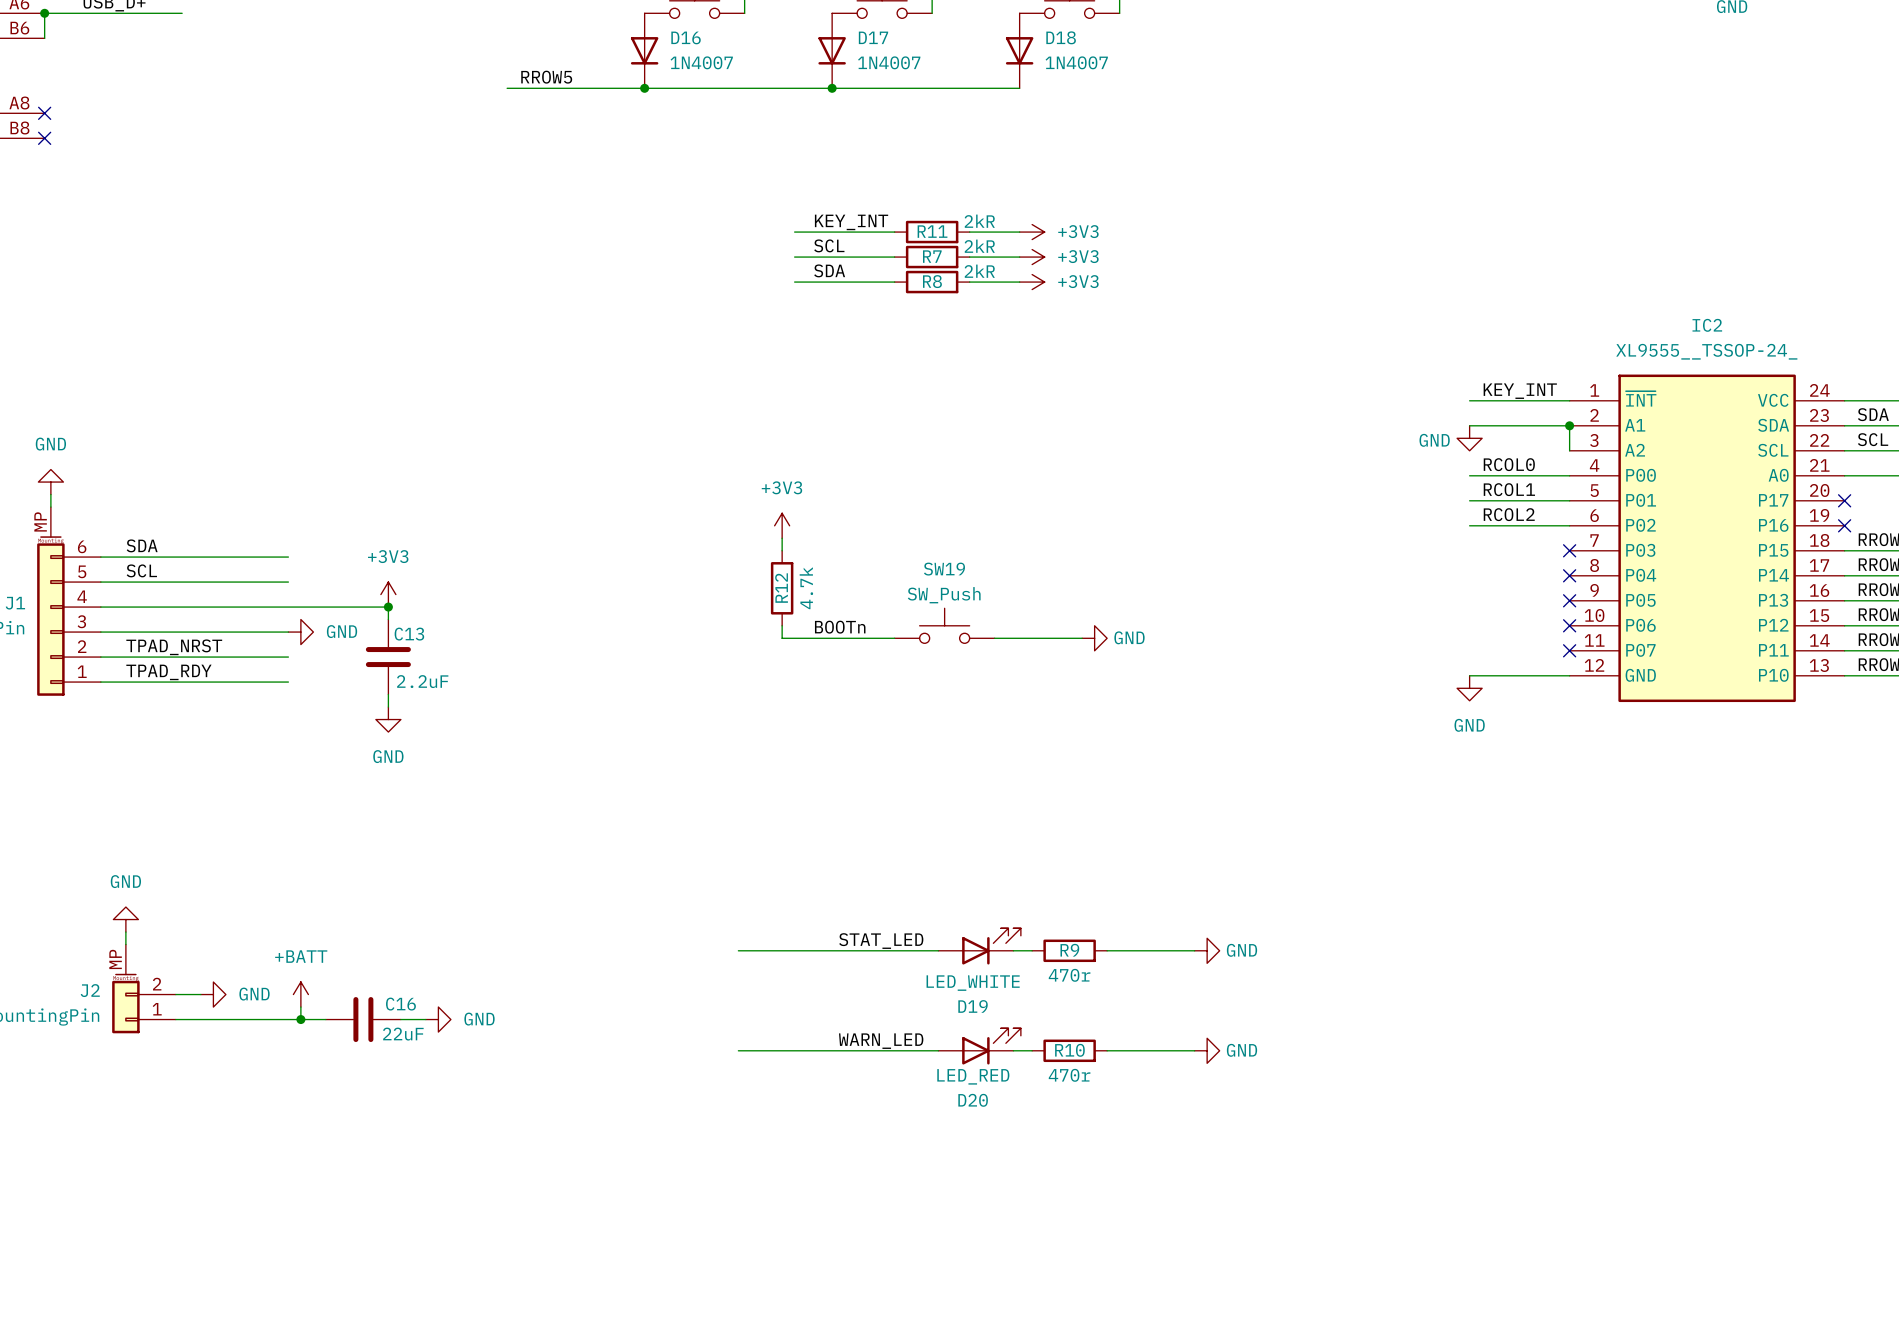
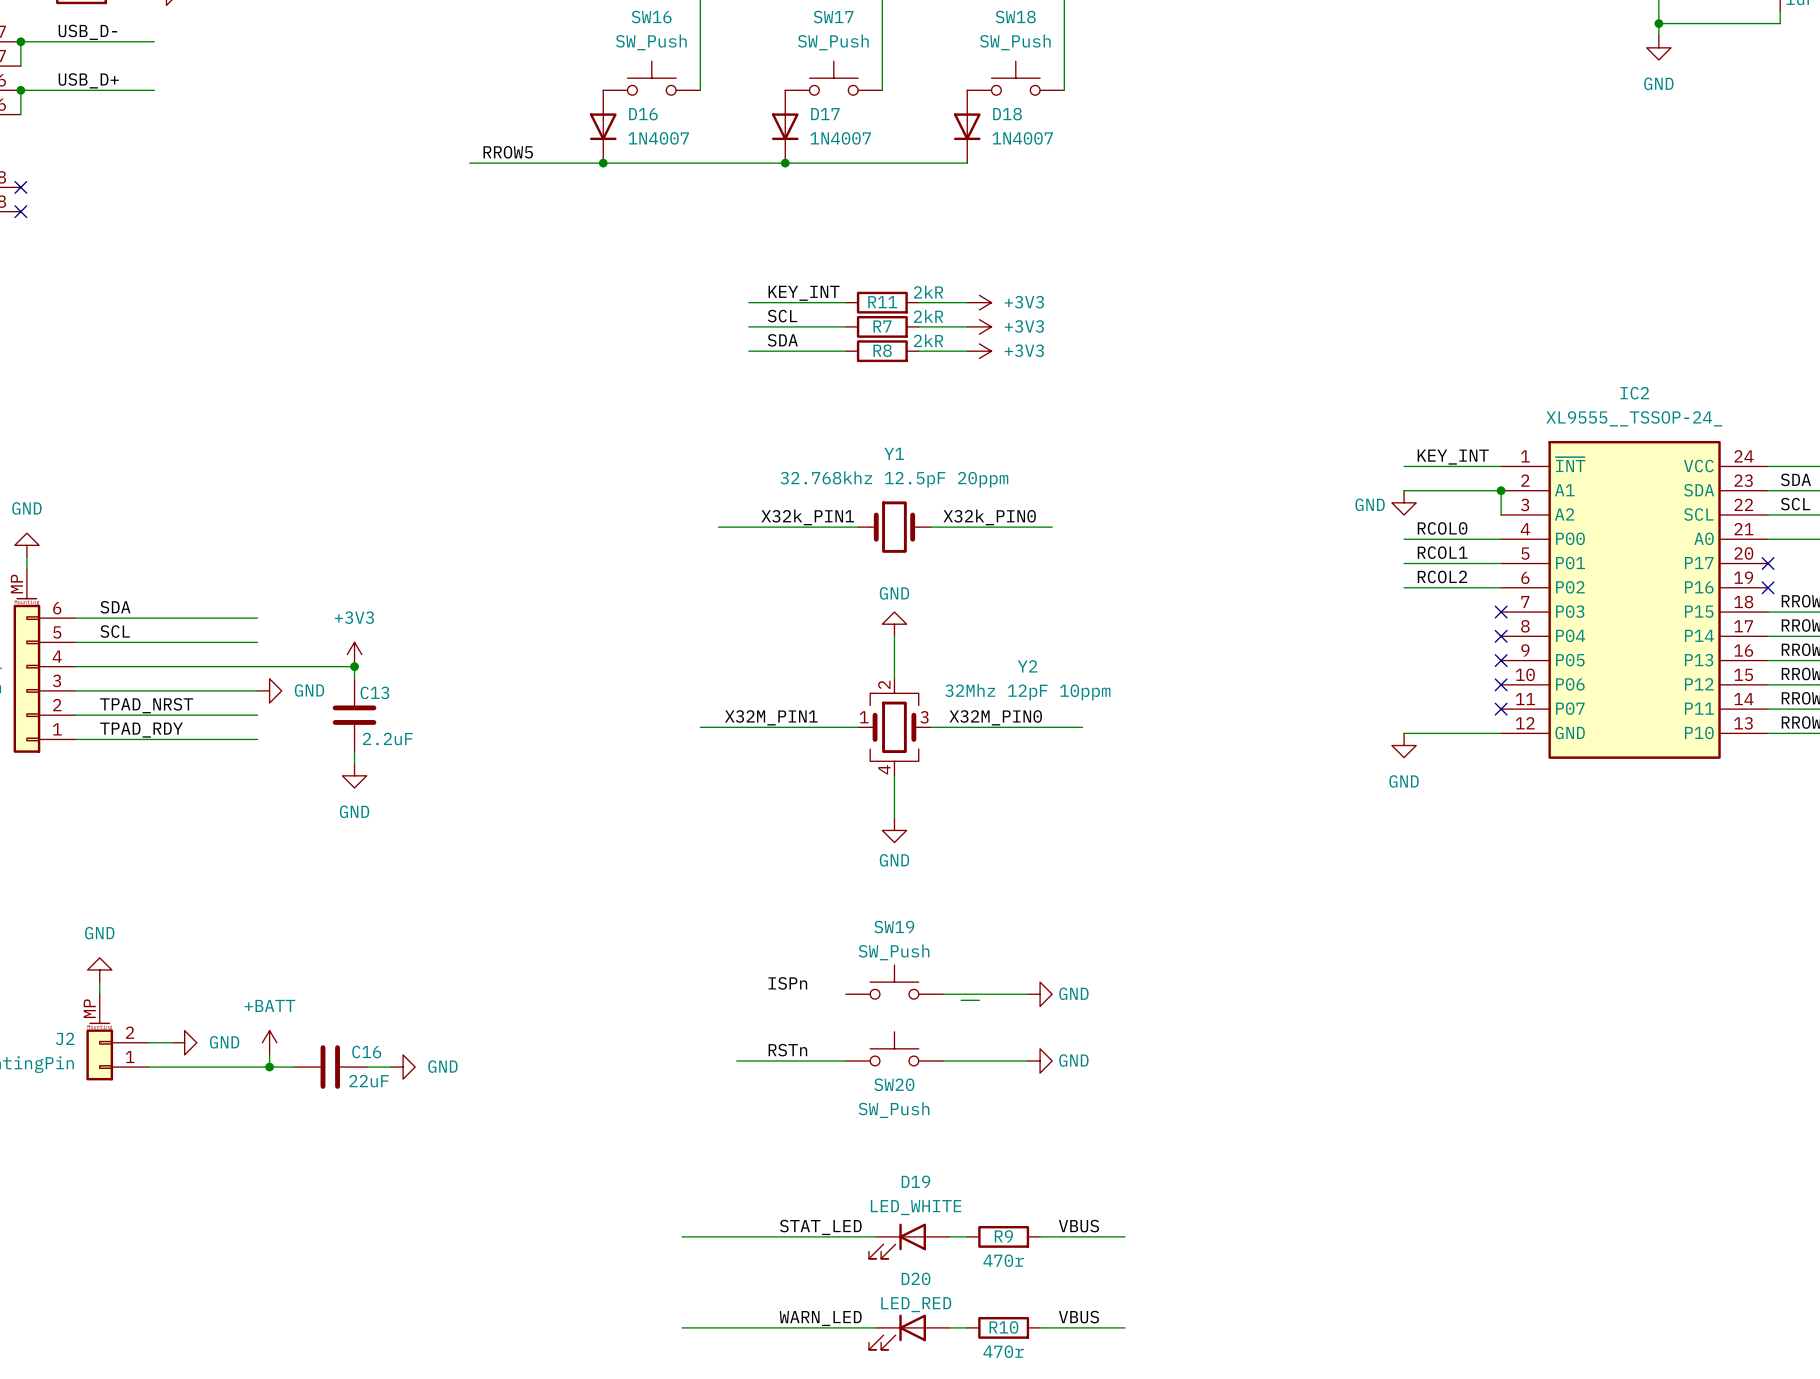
label: none -> X32k_PIN1 (807, 517)
label: none -> X32k_PIN0 (989, 517)
wire: none -> (718, 527) (858, 527)
Y1: none -> 32.768khz 12.5pF 20ppm (894, 527)
wire: none -> (930, 527) (1052, 527)
power symbol: +3V3 (782, 525) -> none
wire: (782, 538) (782, 550) -> none
power symbol: none -> GND (894, 624)
wire: none -> (894, 636) (894, 678)
R12: 4.7k (782, 588) -> none
wire: (782, 625) (782, 638) (894, 638) -> none
SW19 position: (944, 625) -> (894, 982)
label: BOOTn (840, 627) -> none
wire: (994, 638) (1082, 638) -> none
power symbol: GND (1094, 638) -> none
label: none -> X32M_PIN1 (771, 717)
label: none -> X32M_PIN0 (995, 717)
wire: none -> (700, 727) (858, 727)
Y2: none -> 32Mhz 12pF 10ppm (894, 727)
wire: none -> (930, 727) (1082, 727)
wire: none -> (894, 775) (894, 818)
power symbol: none -> GND (894, 830)
label: none -> ISPn (787, 983)
label position: STAT_LED (881, 941) -> STAT_LED (820, 1227)
power symbol: none -> GND (1040, 994)
D19 position: (979, 946) -> (909, 1241)
D19 rotation: 0° (991, 946) -> 180° (897, 1241)
wire: (738, 950) (938, 950) -> none
R9 position: (1069, 950) -> (1003, 1236)
wire: (1107, 950) (1194, 950) -> (942, 994) (1027, 994)
power symbol: GND (1207, 950) -> none
SW20: none -> SW_Push (894, 1048)
label: none -> RSTn (787, 1050)
wire: none -> (736, 1060) (845, 1060)
wire: none -> (942, 1060) (1027, 1060)
power symbol: none -> GND (1040, 1060)
label position: WARN_LED (881, 1041) -> WARN_LED (820, 1318)
D20 position: (979, 1046) -> (909, 1332)
D20 rotation: 0° (991, 1046) -> 180° (897, 1332)
wire: (738, 1050) (938, 1050) -> (682, 1236) (876, 1236)
wire: (1013, 1050) (1032, 1050) -> (949, 1236) (967, 1236)
R10 position: (1069, 1050) -> (1003, 1327)
wire: (1107, 1050) (1194, 1050) -> (1040, 1236) (1124, 1236)
power symbol: GND (1207, 1050) -> none
label: none -> VBUS (1078, 1226)
label: none -> VBUS (1078, 1317)
wire: none -> (682, 1327) (876, 1327)
wire: none -> (949, 1327) (967, 1327)
wire: none -> (1040, 1327) (1124, 1327)

